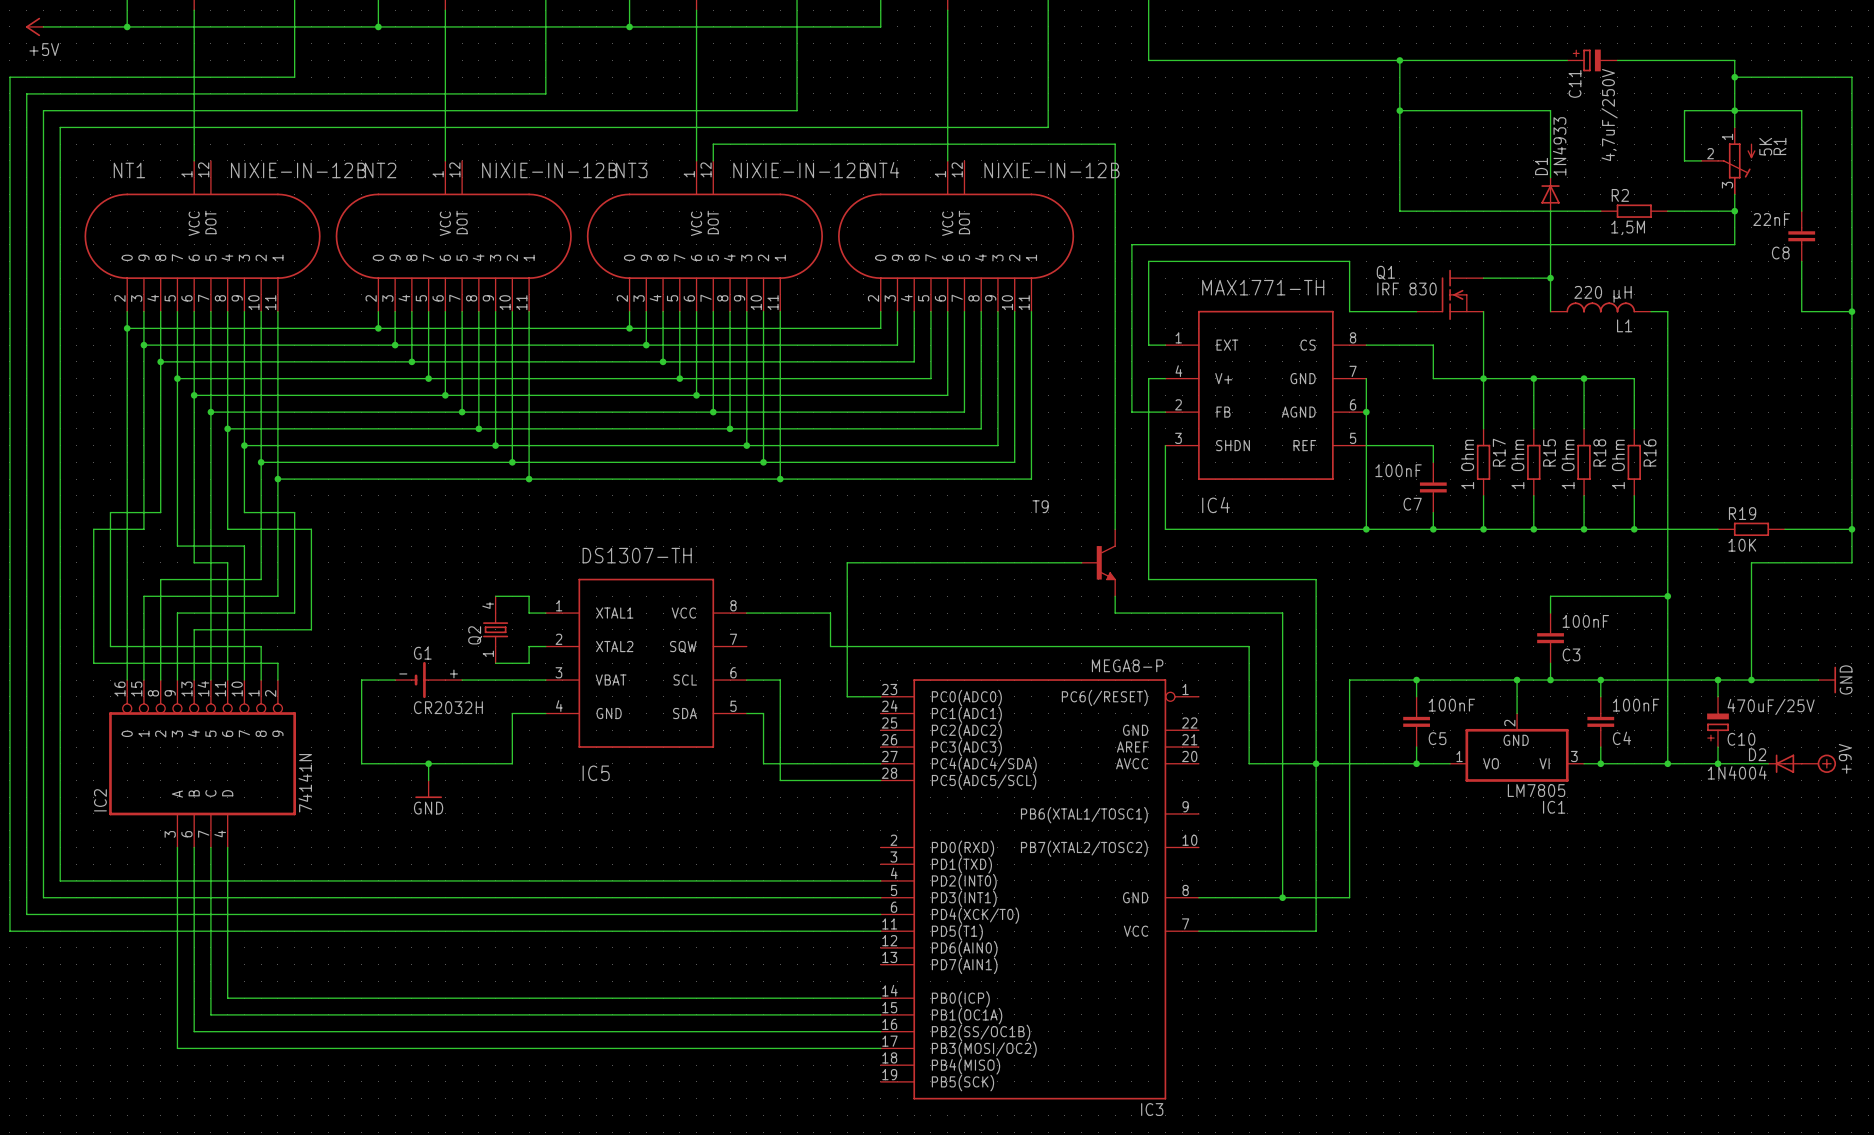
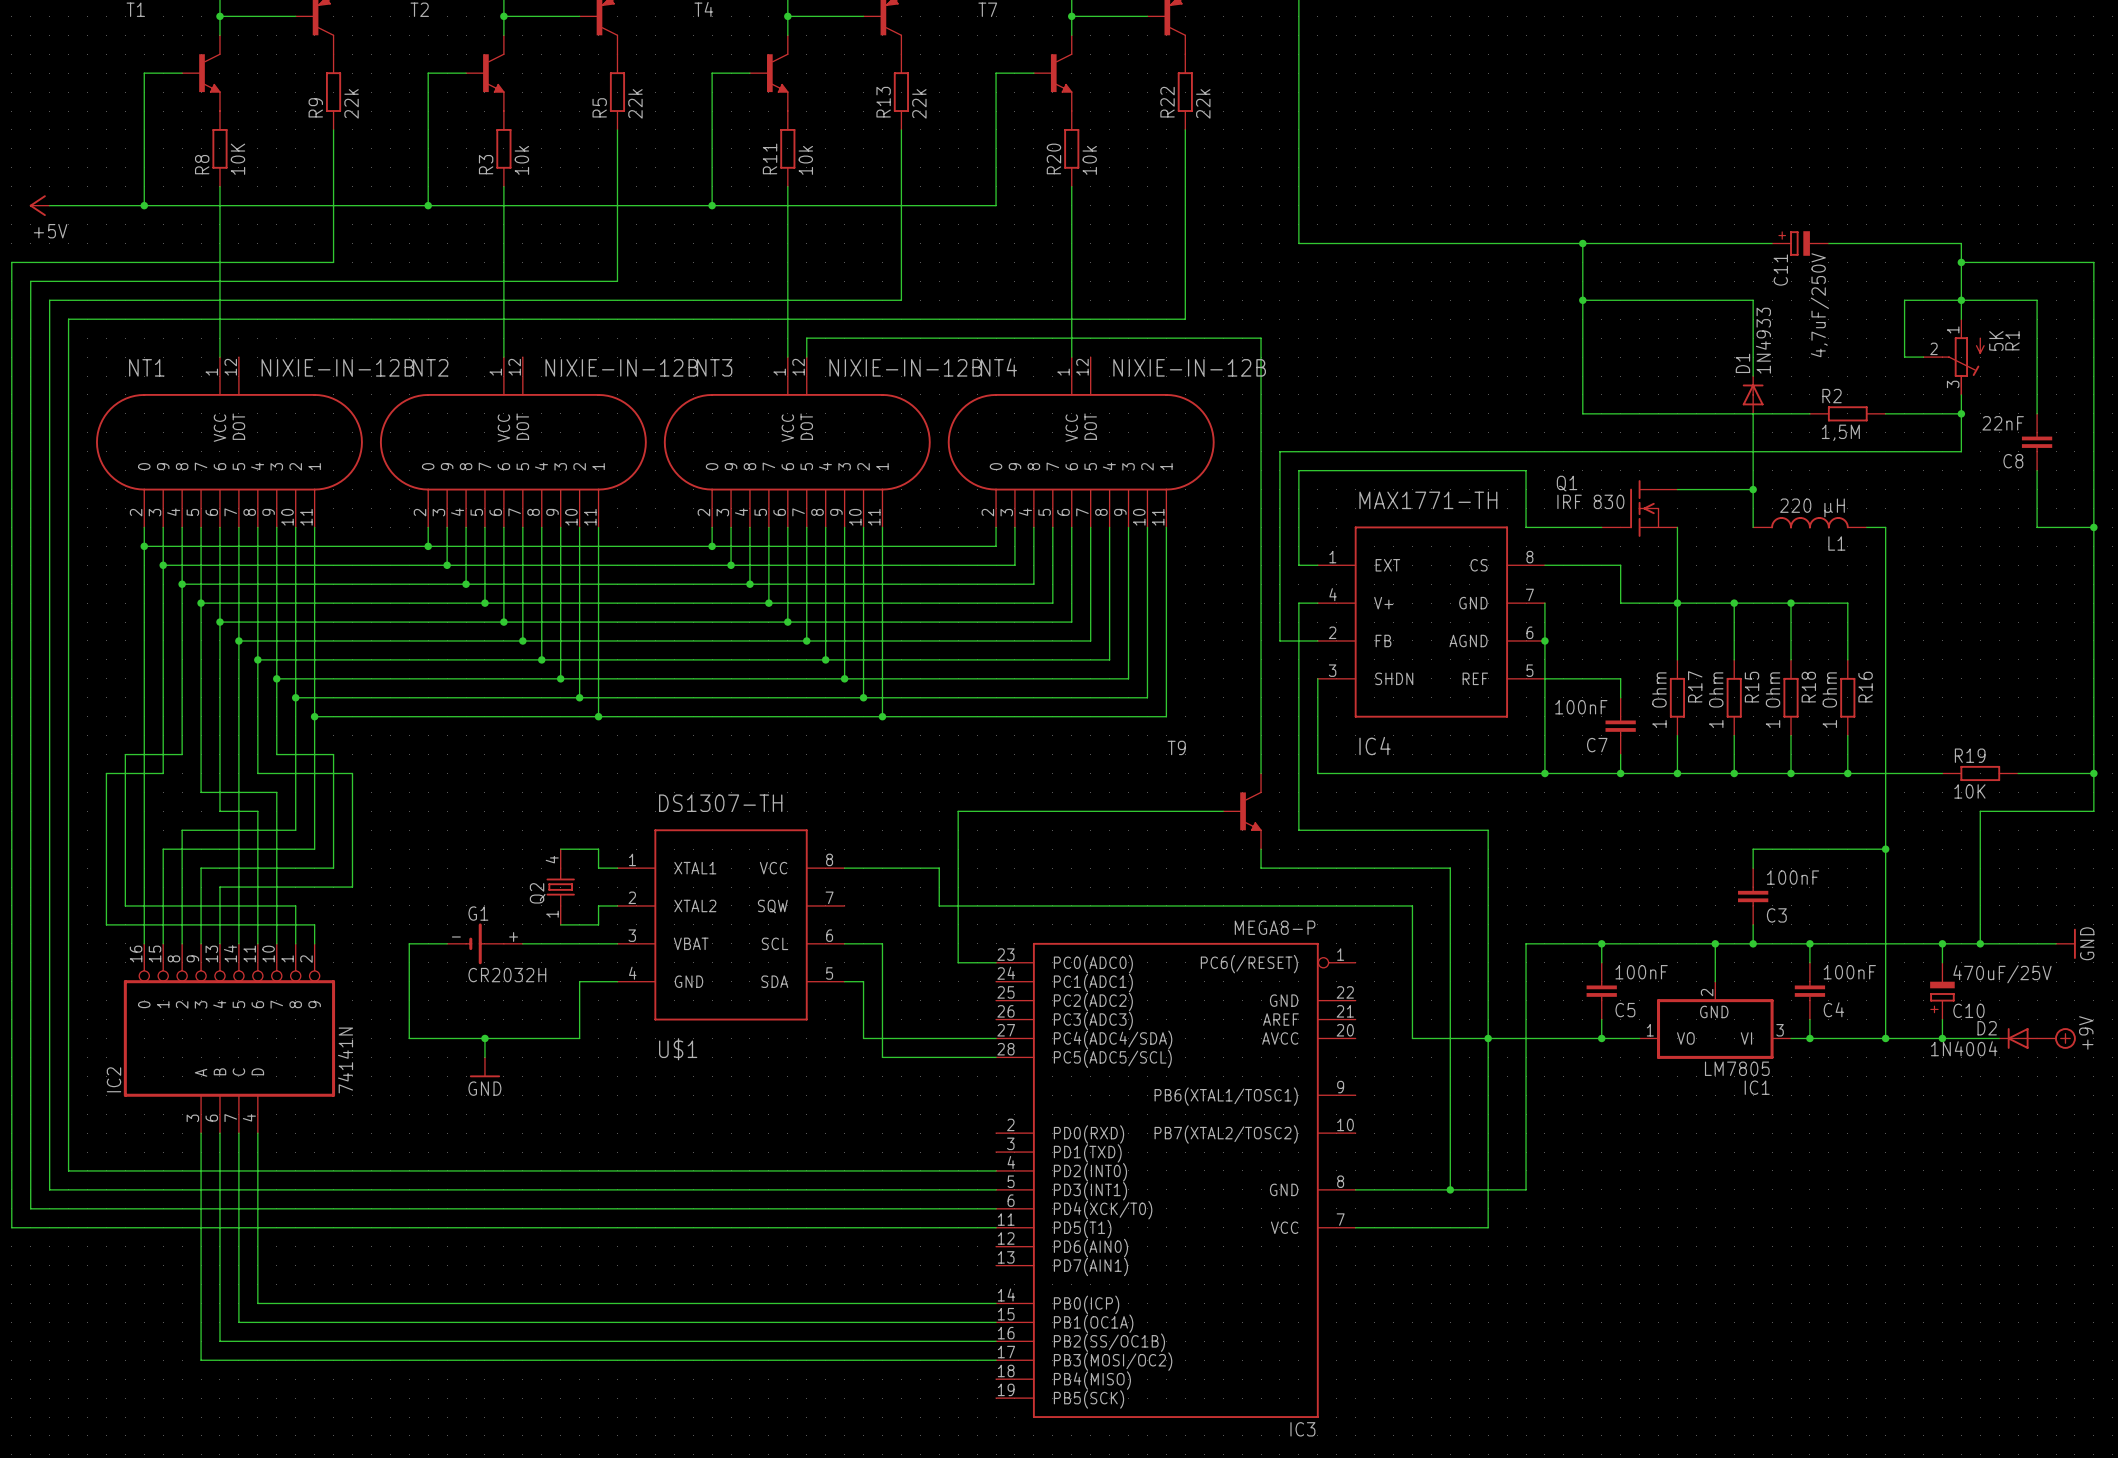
IC5 name: IC5 (596, 773) -> U$1 (678, 1049)

